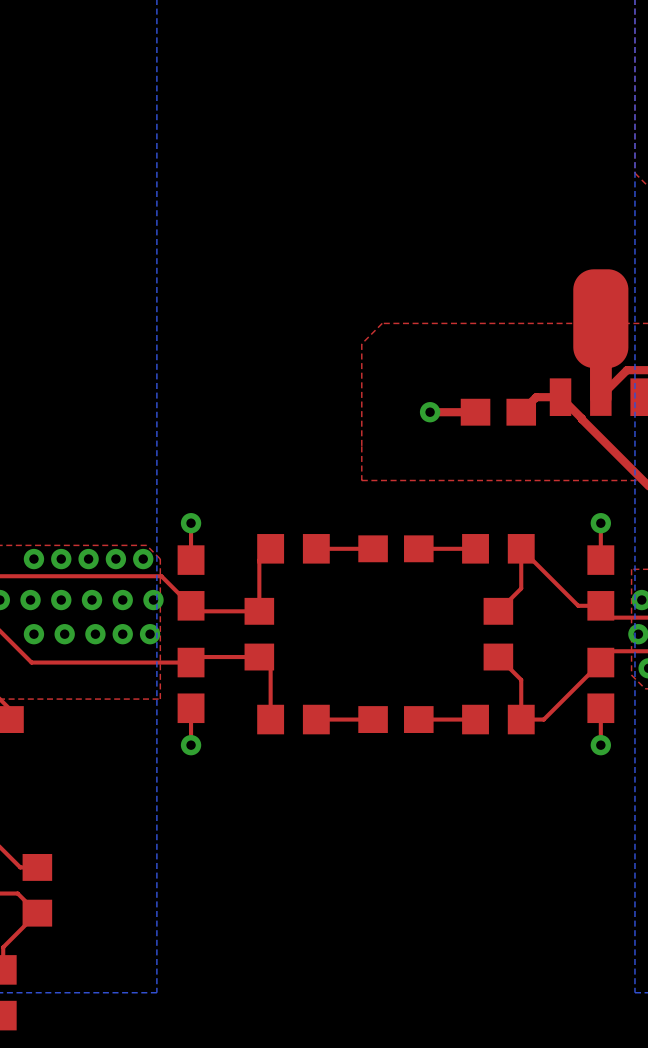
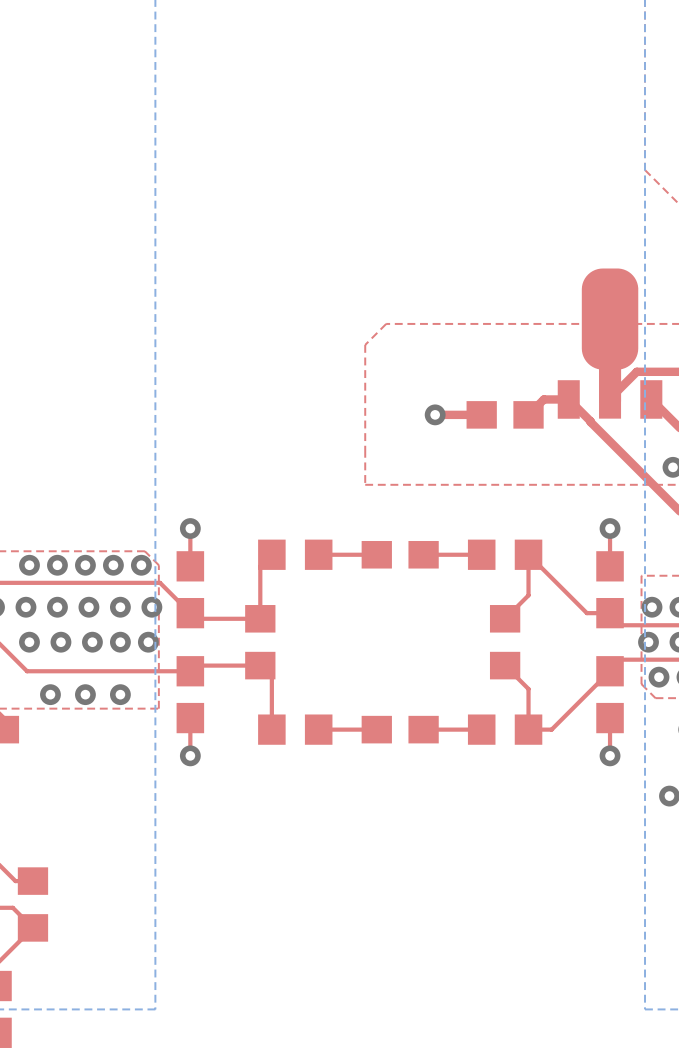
via: none -> (50, 694)
via: none -> (85, 694)
via: none -> (120, 694)

